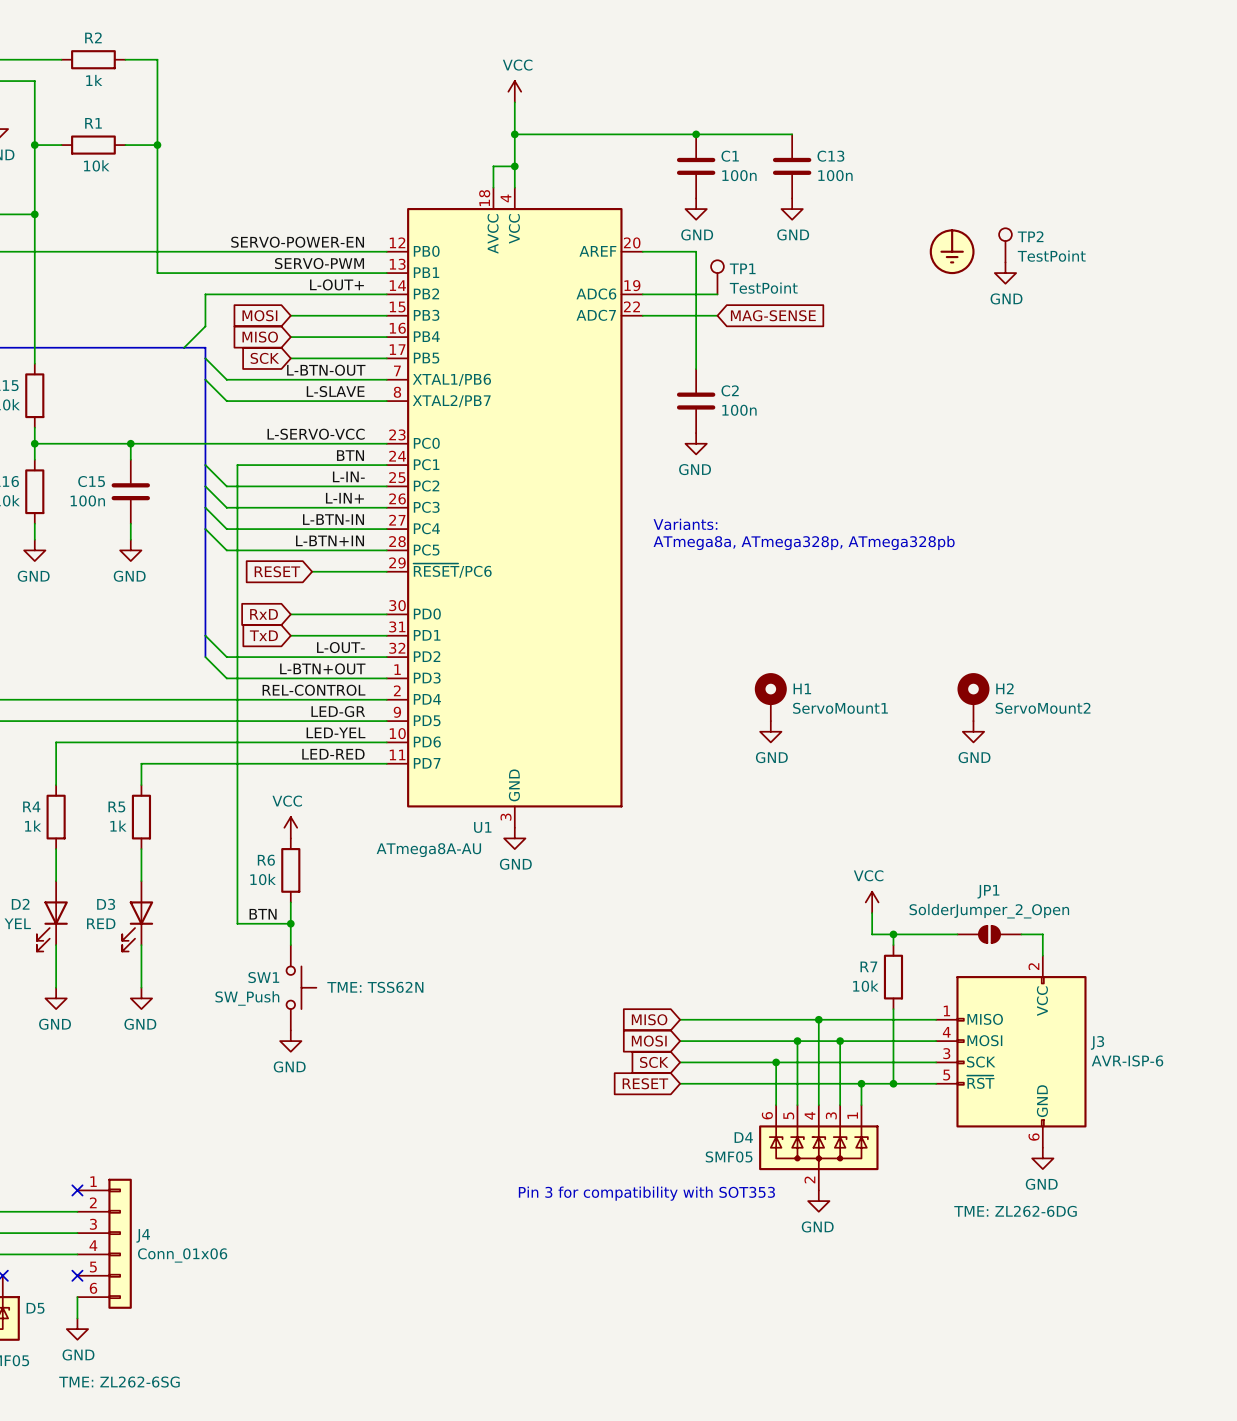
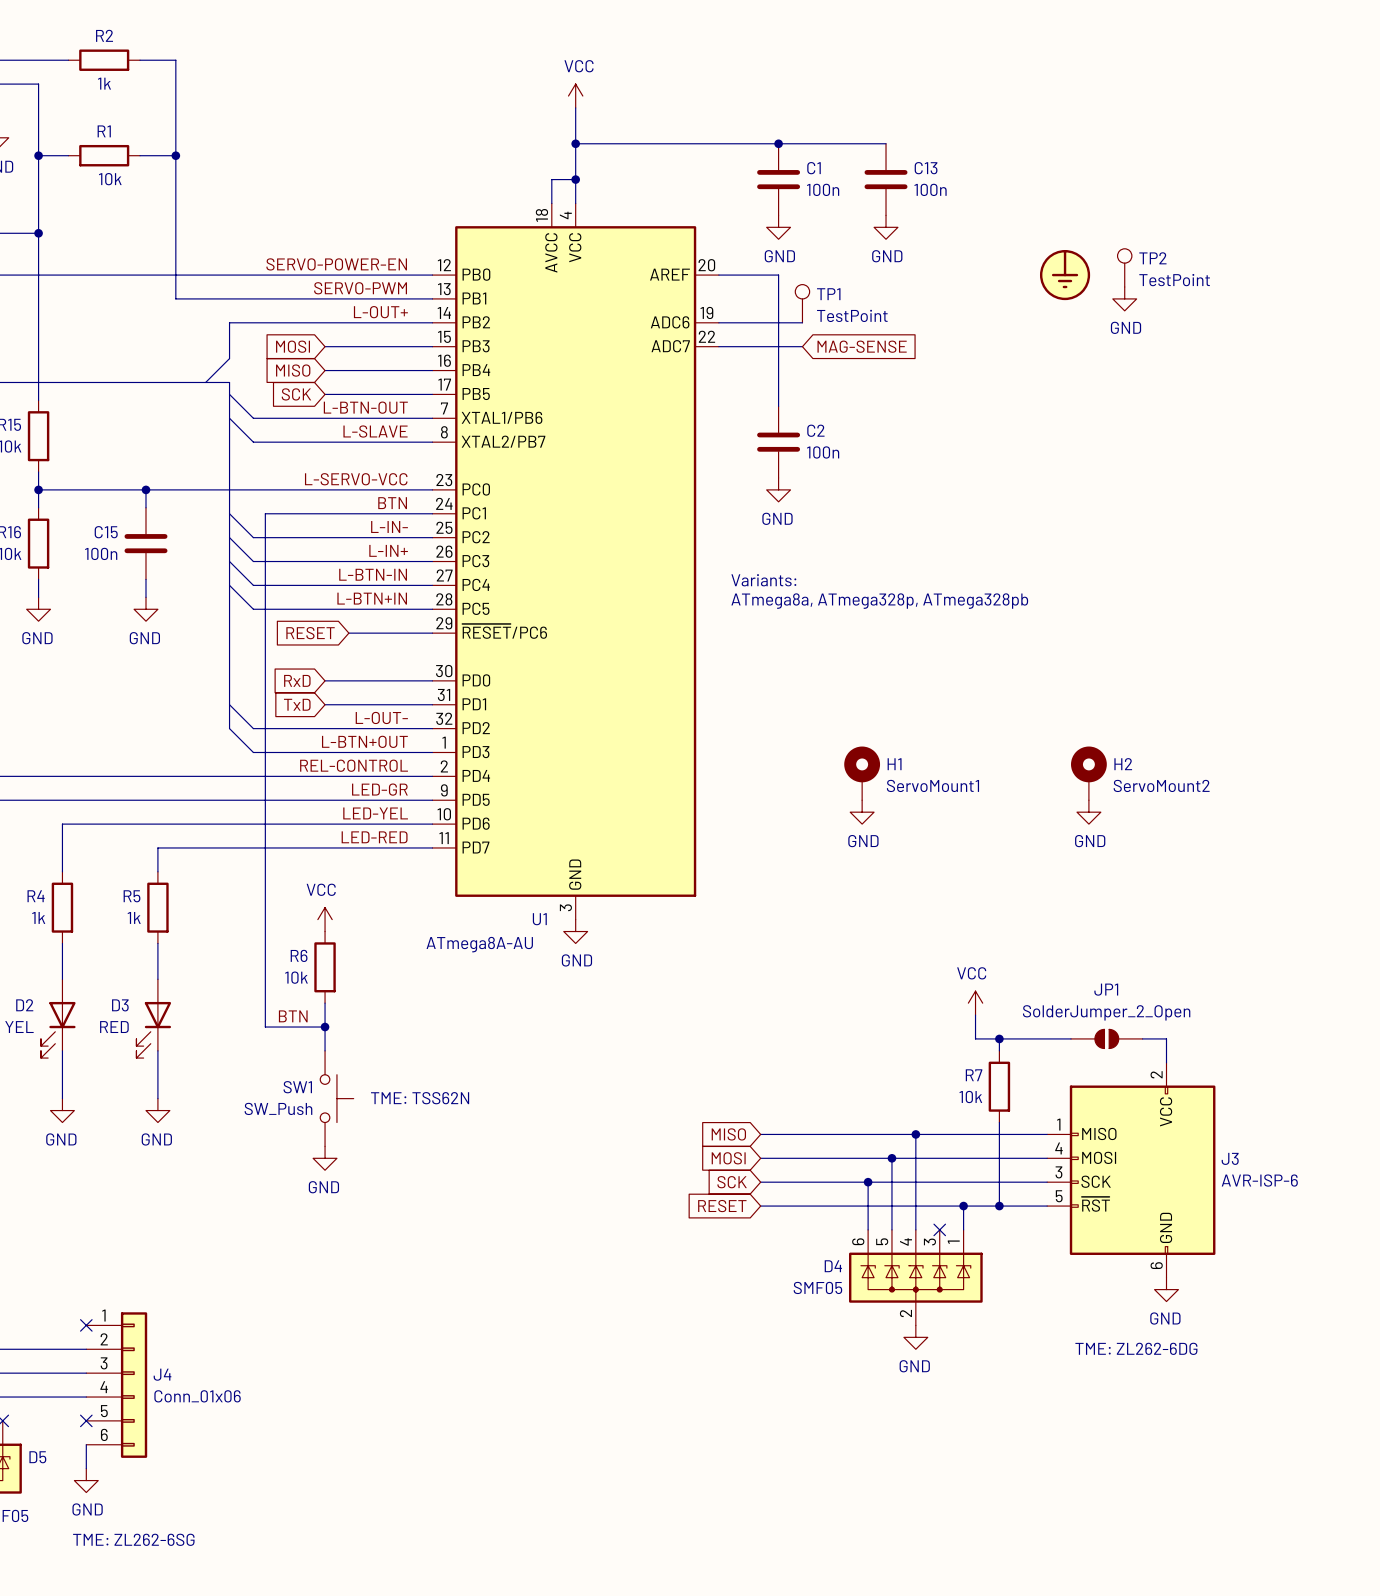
wire: (840, 1041) (840, 1105) -> none
junction: (840, 1041) -> none
no-connect mark: none -> (939, 1229)
text: Pin 3 for compatibility with SOT353 (646, 1193) -> none

